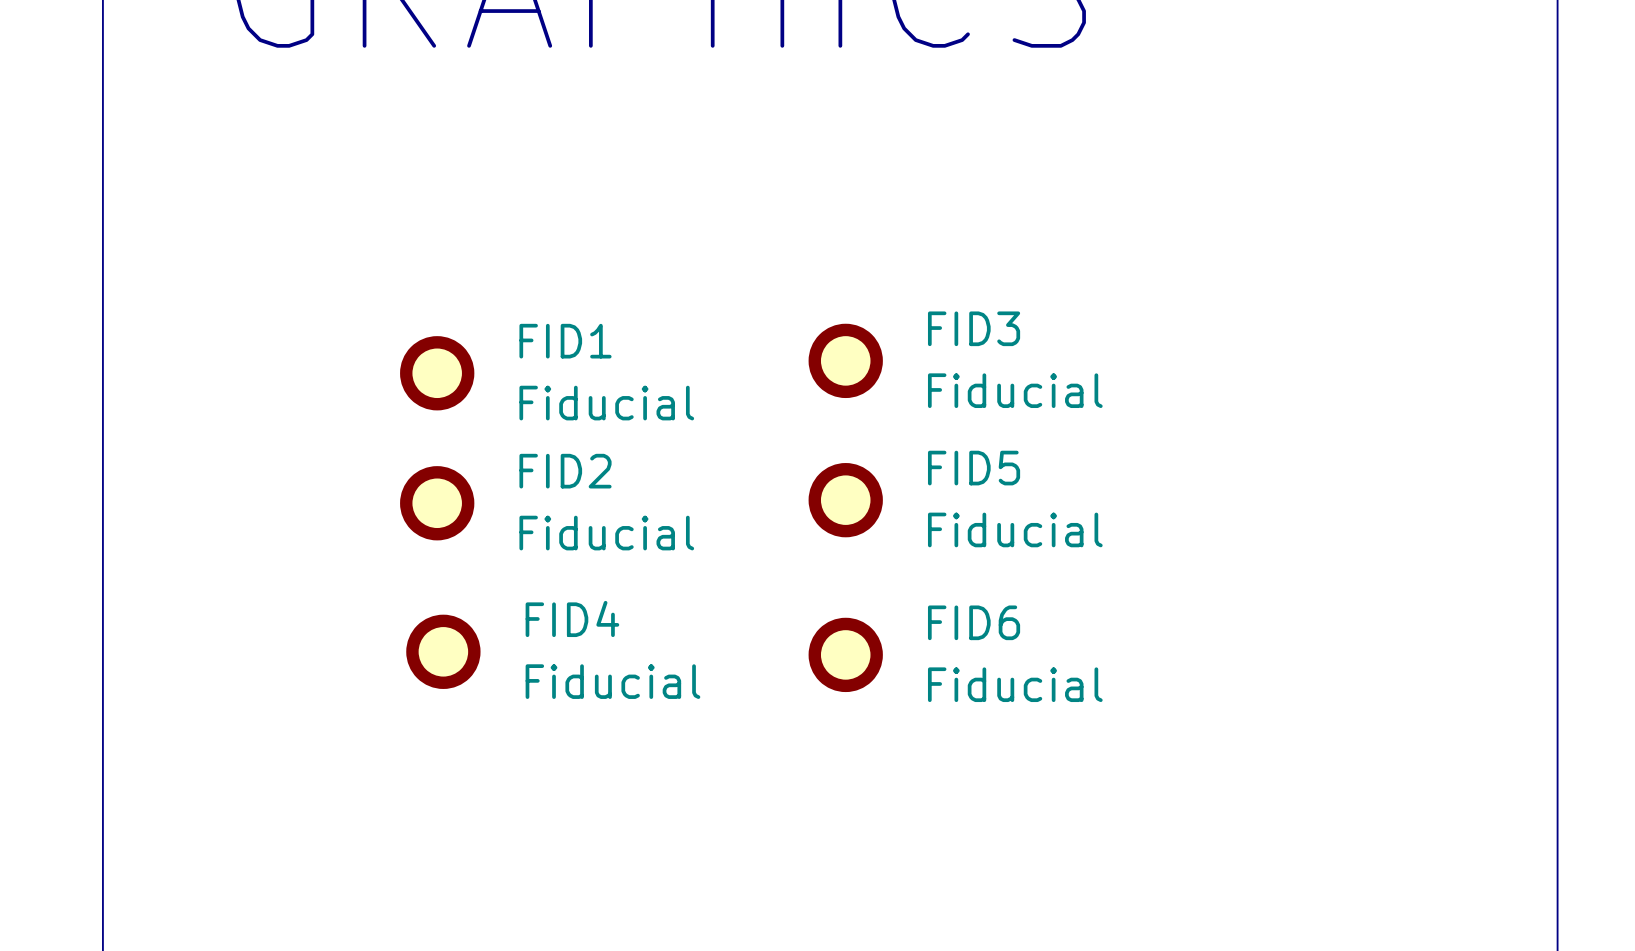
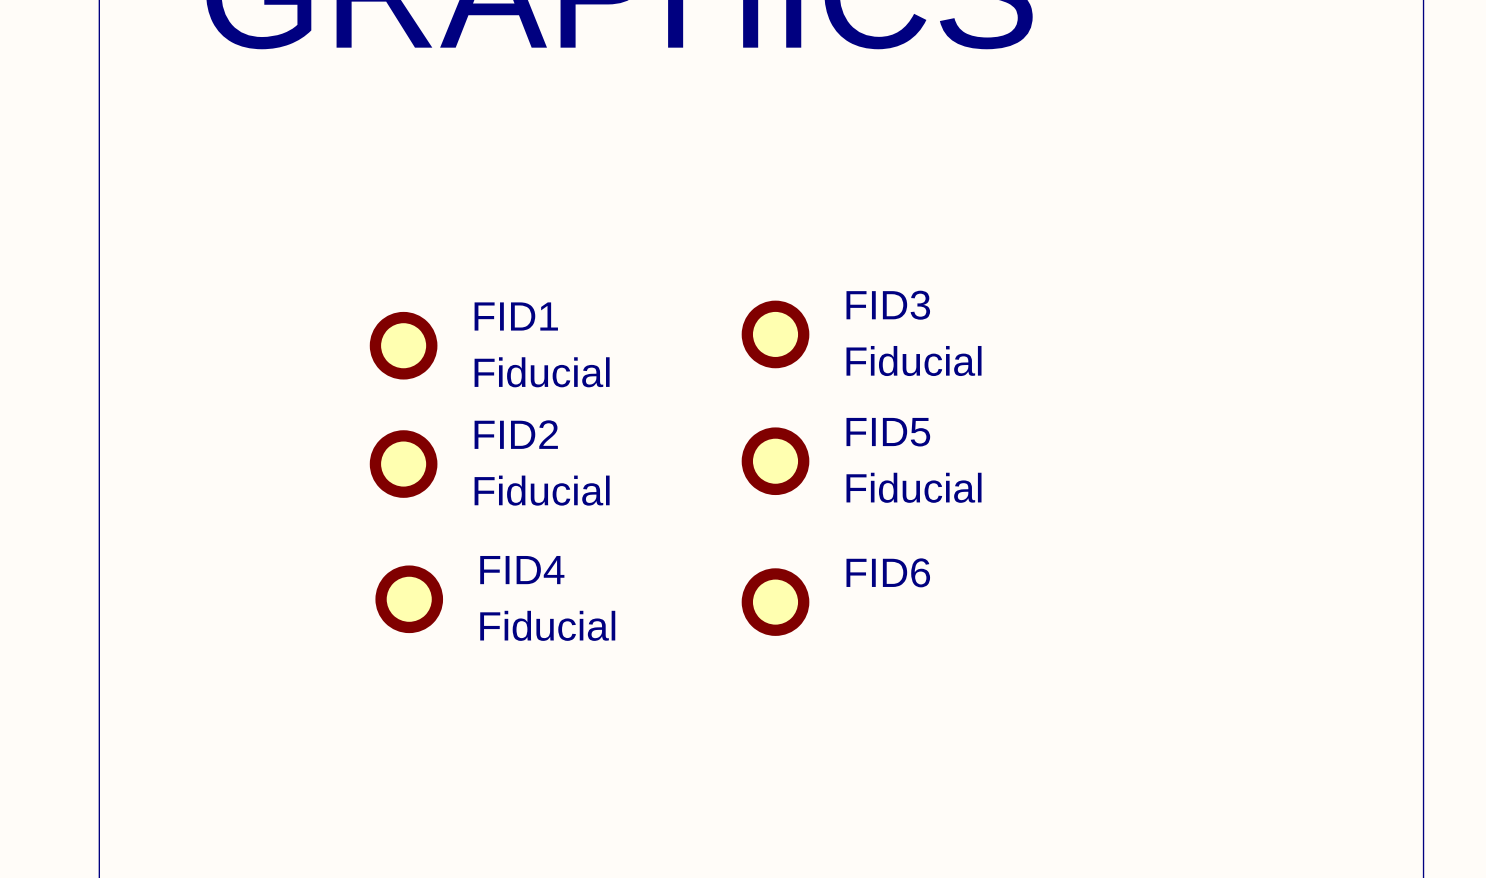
FID6 value: Fiducial (1015, 684) -> none

